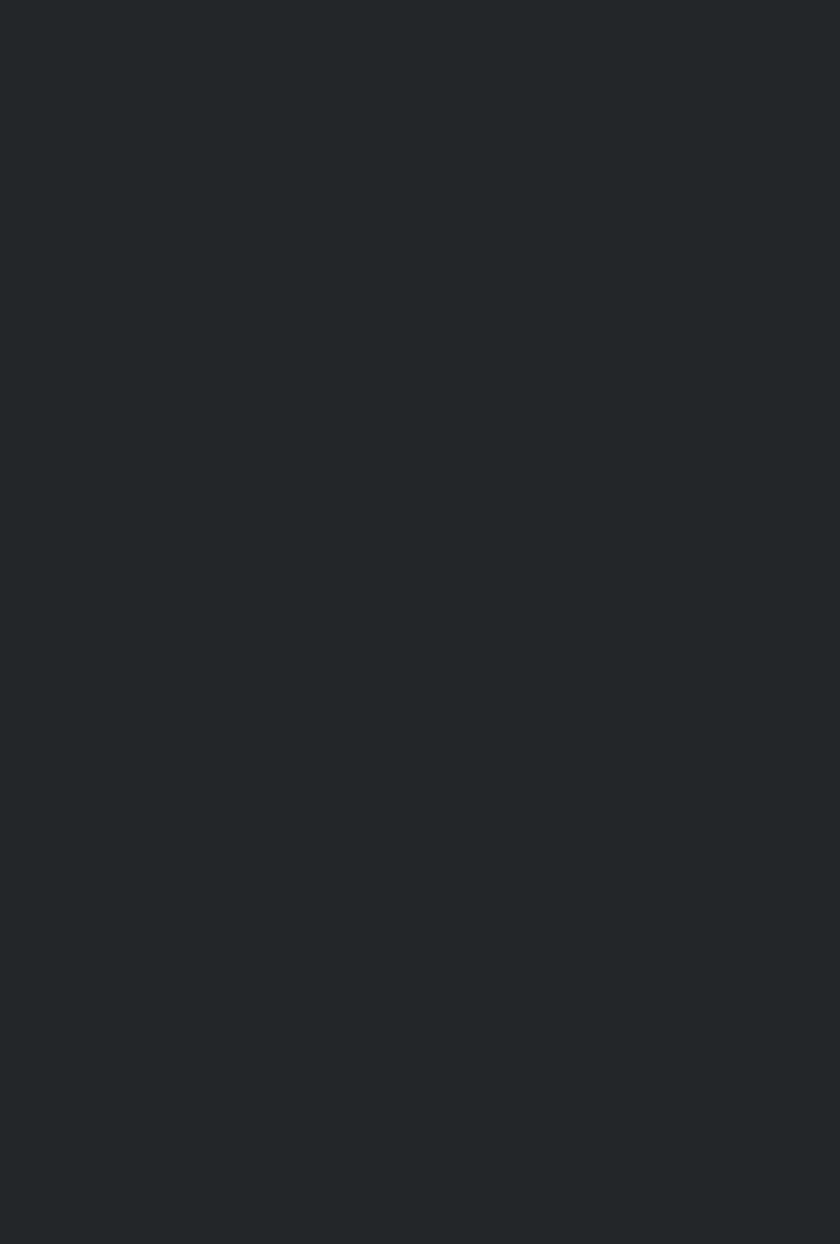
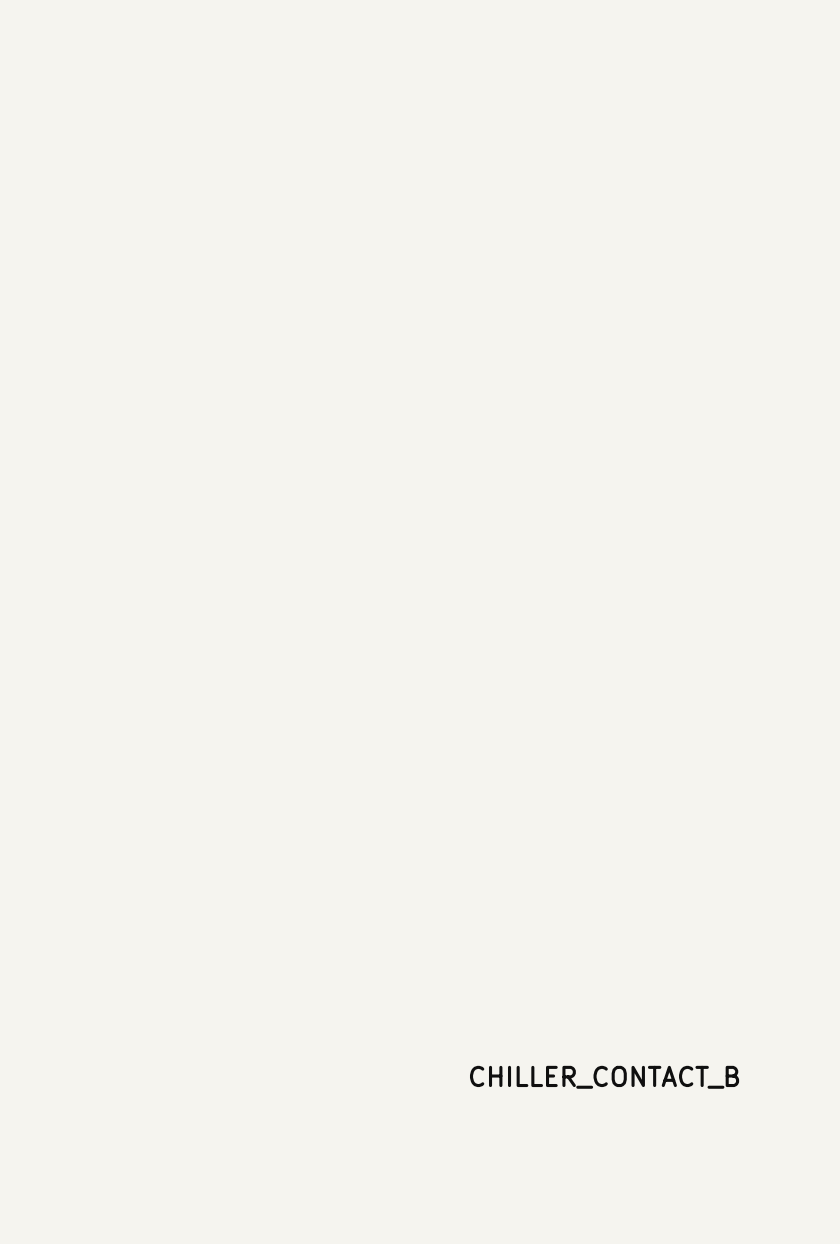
label: none -> CHILLER_CONTACT_B (604, 1077)

